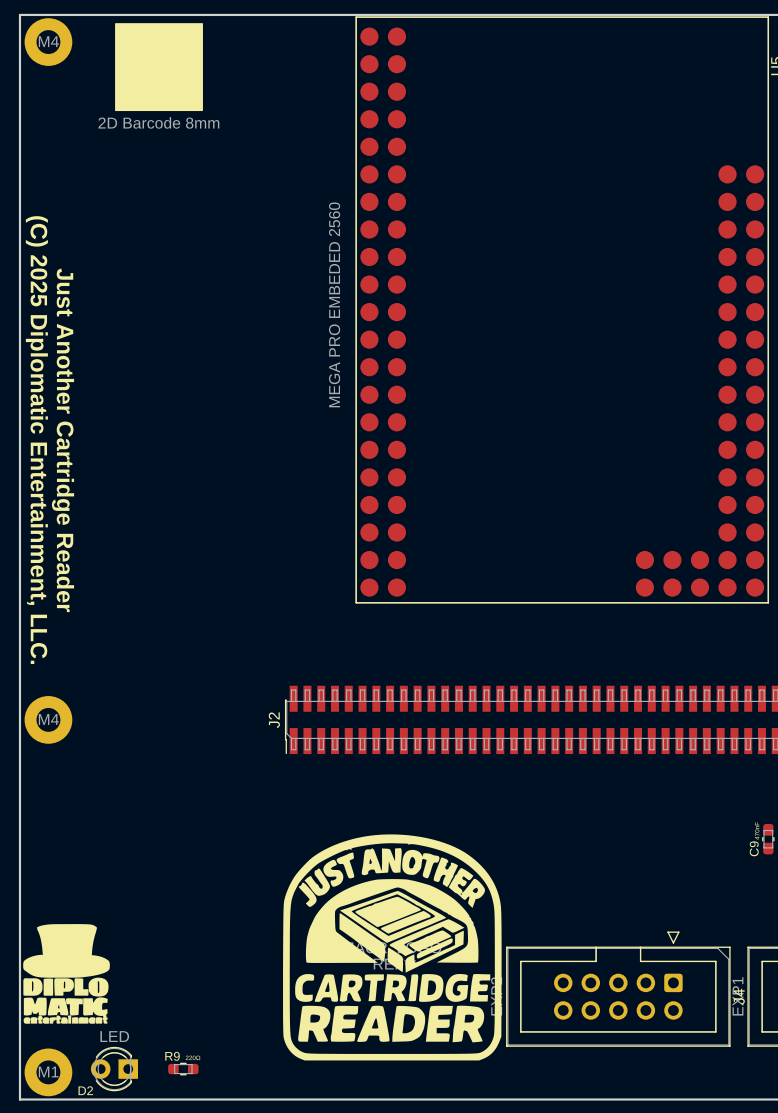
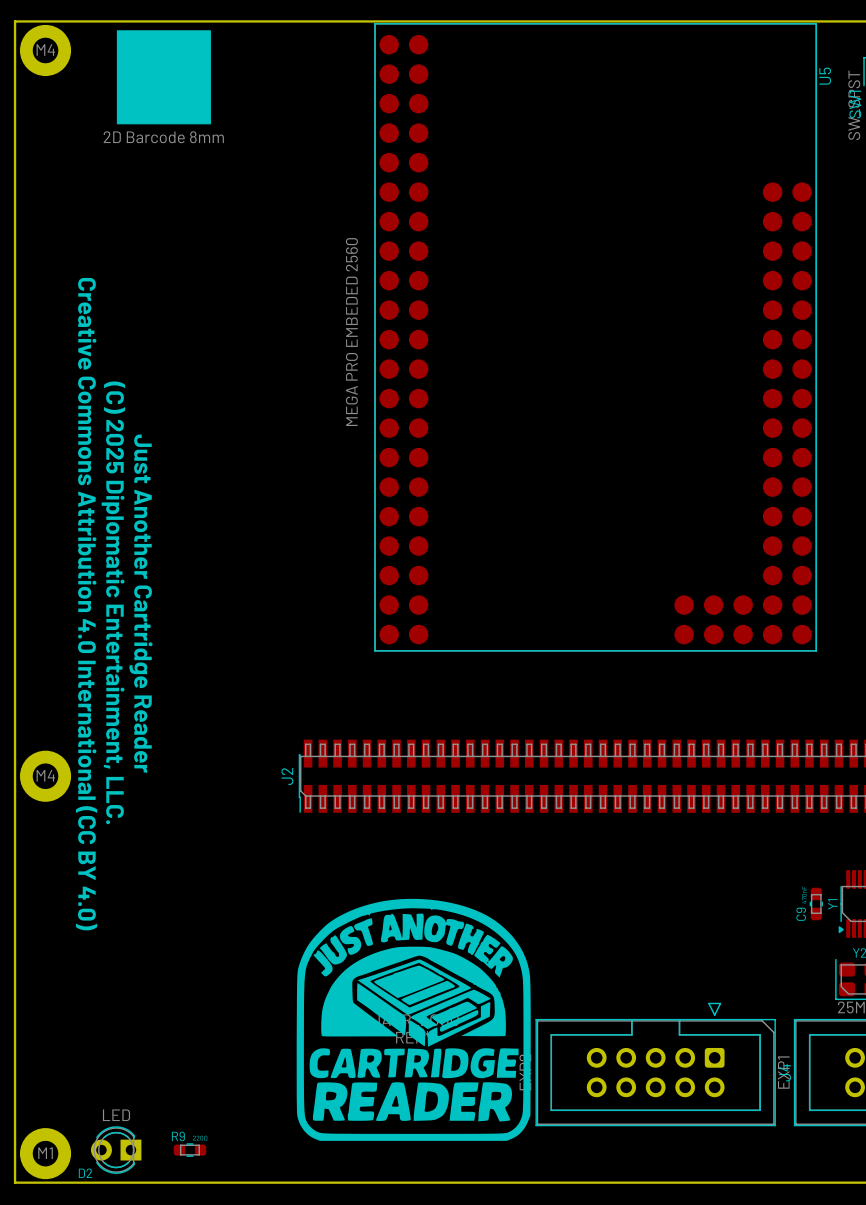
text position: (C) 2025 Diplomatic Entertainment, LLC. (36, 440) -> (C) 2025 Diplomatic Entertainment, LLC. (113, 602)
text position: Just Another Cartridge Reader (63, 440) -> Just Another Cartridge Reader (140, 603)
text: none -> Creative Commons Attribution 4.0 International (CC BY 4.0) (86, 604)
drawing: [23, 924, 110, 1024] -> none

